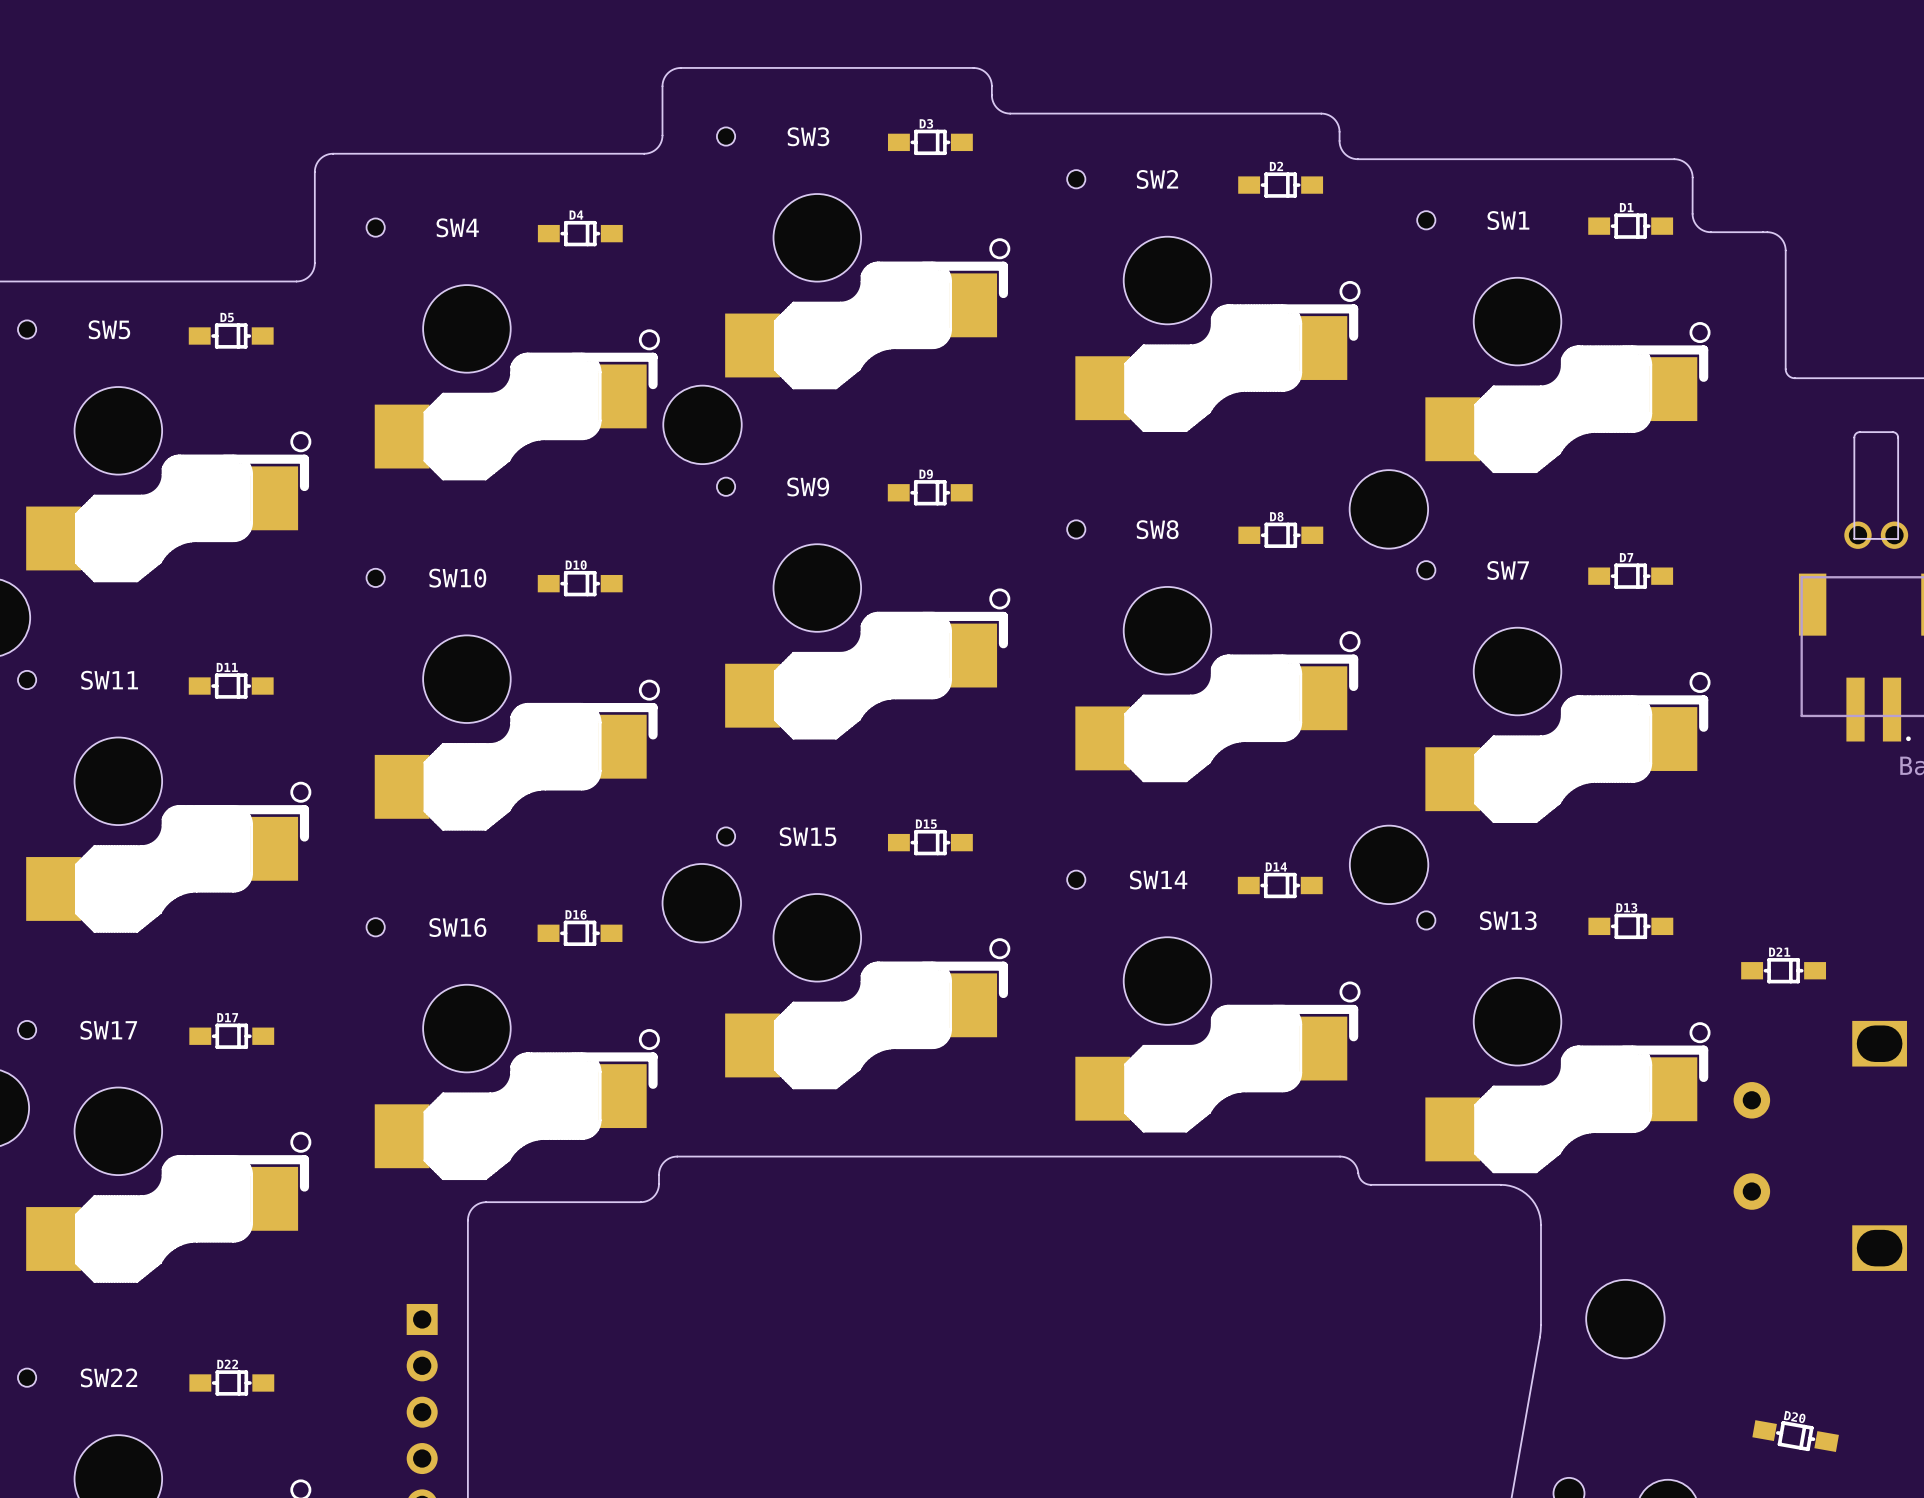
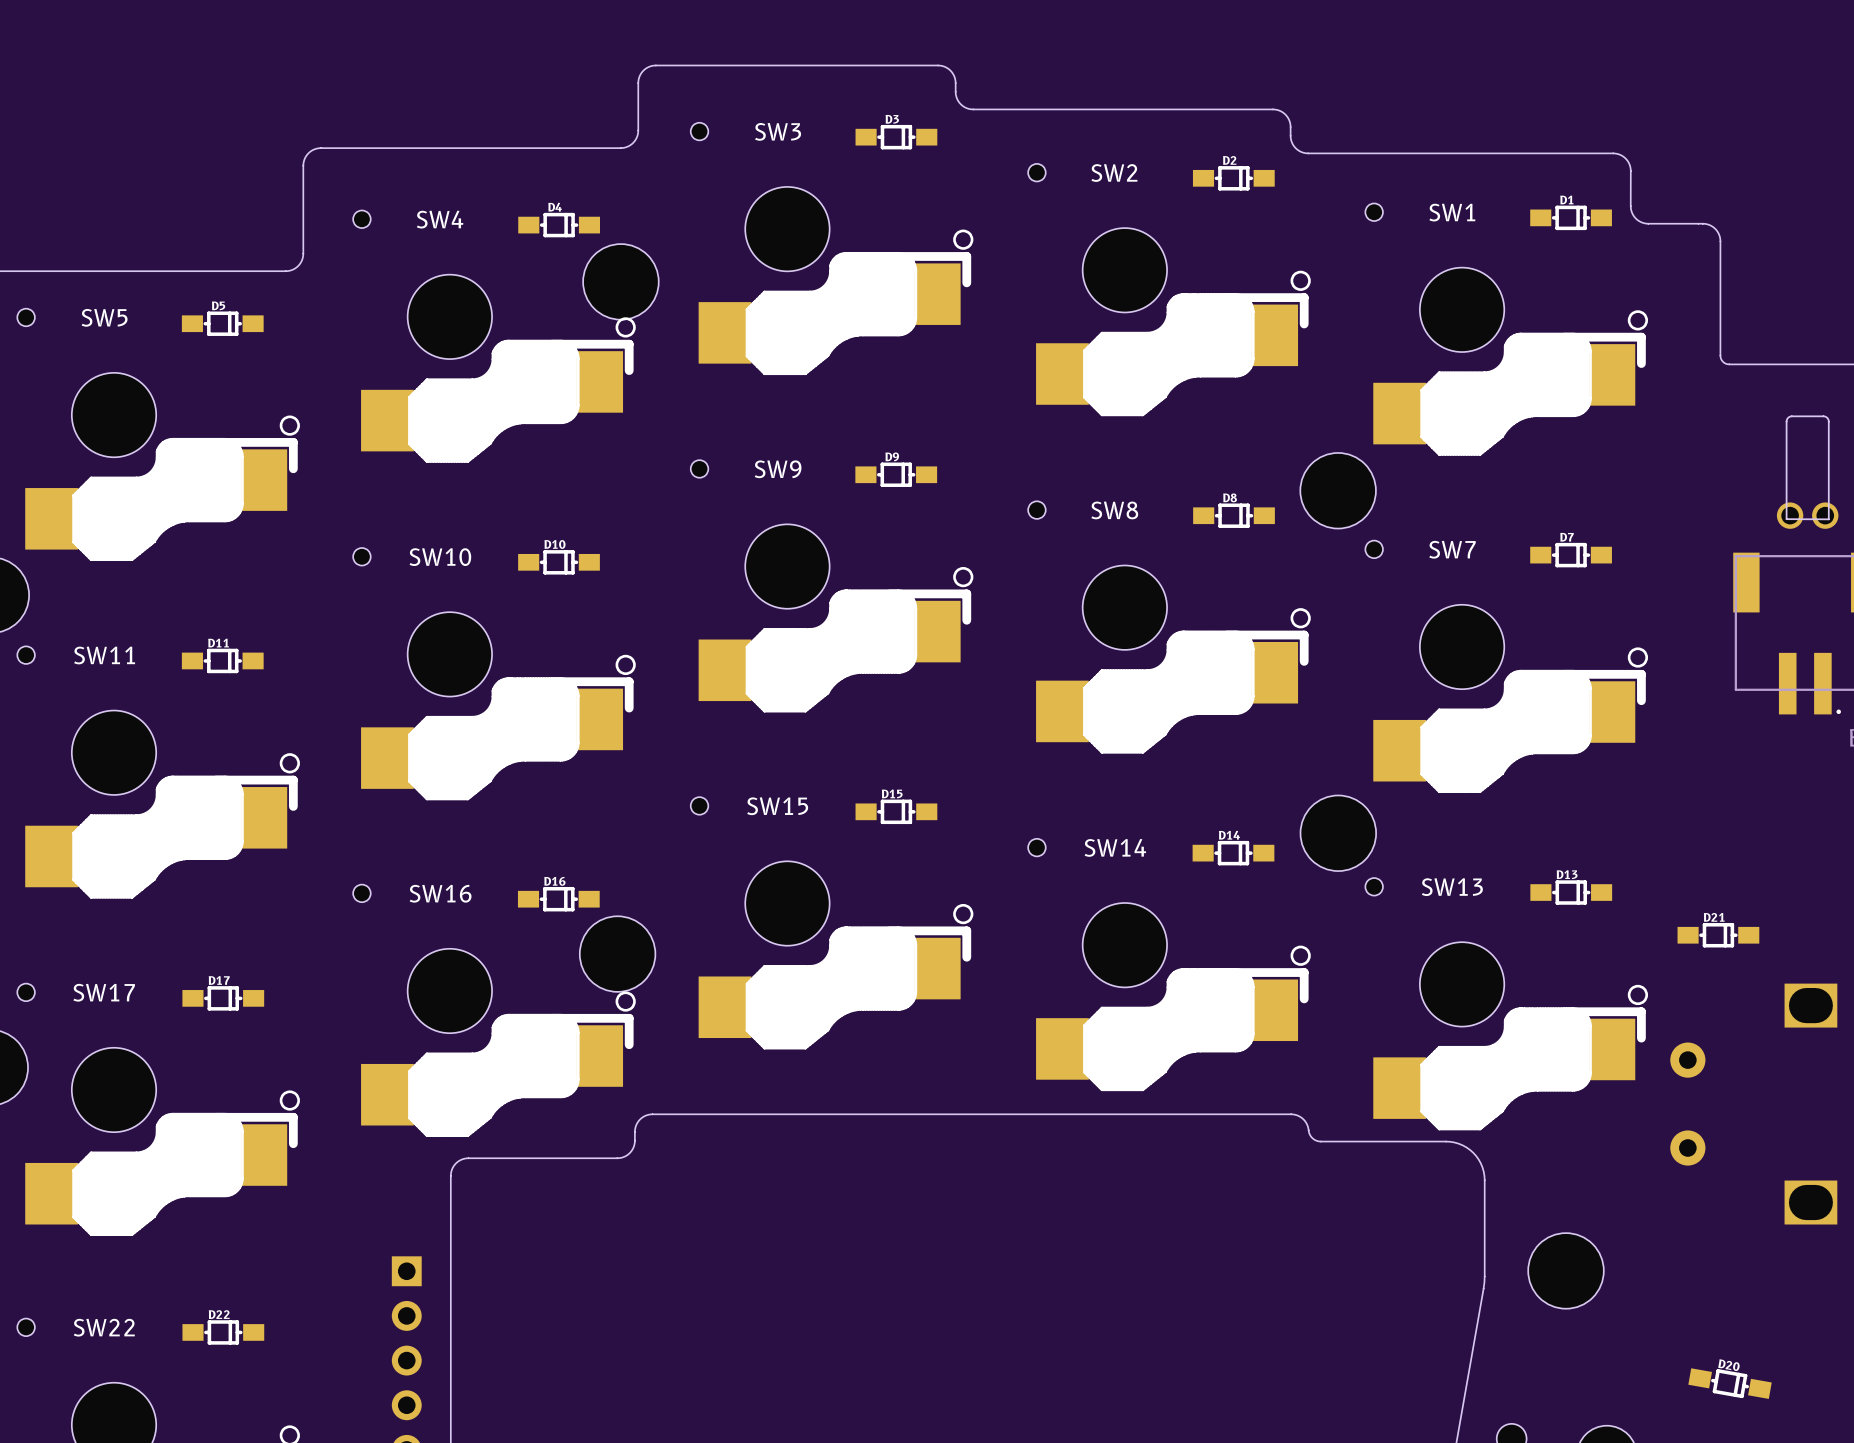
part position: (702, 424) -> (620, 281)
part position: (701, 903) -> (617, 954)

